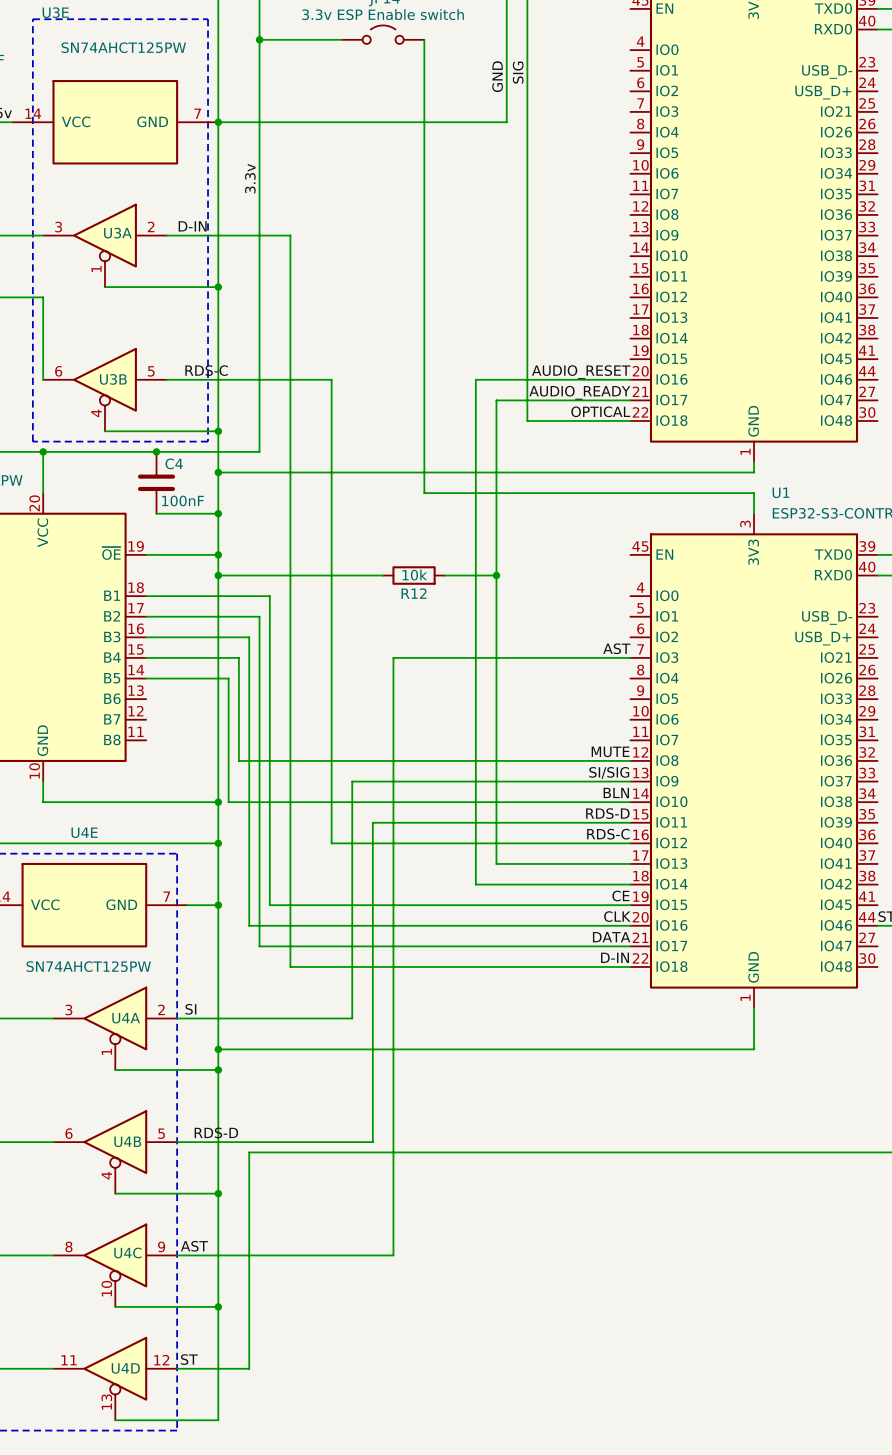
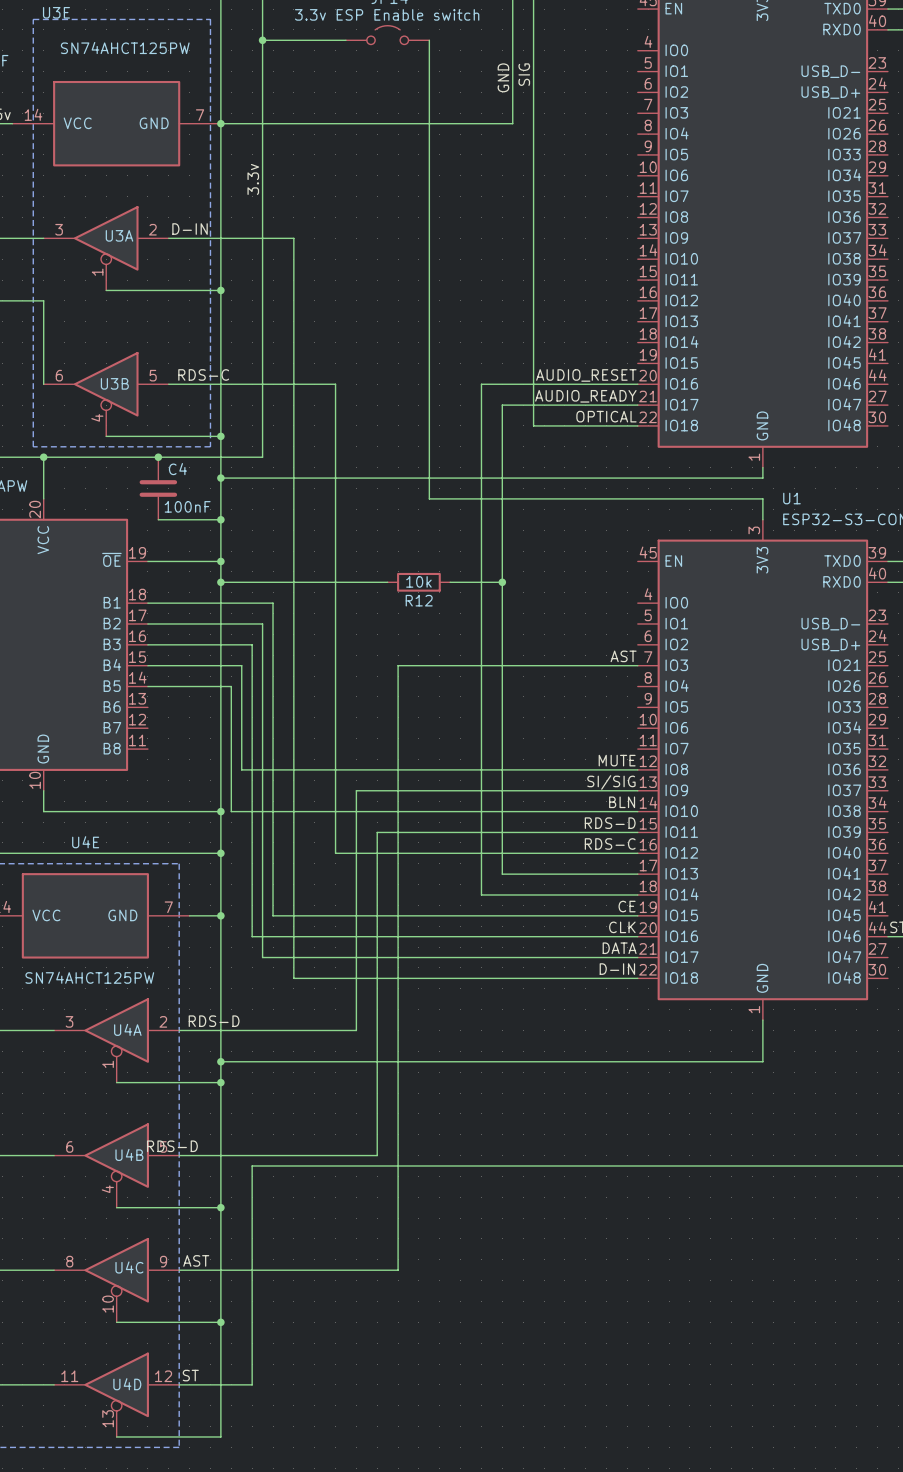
label: SI (190, 1009) -> none
label: none -> RDS-D (214, 1021)
label position: RDS-D (216, 1132) -> RDS-D (172, 1146)

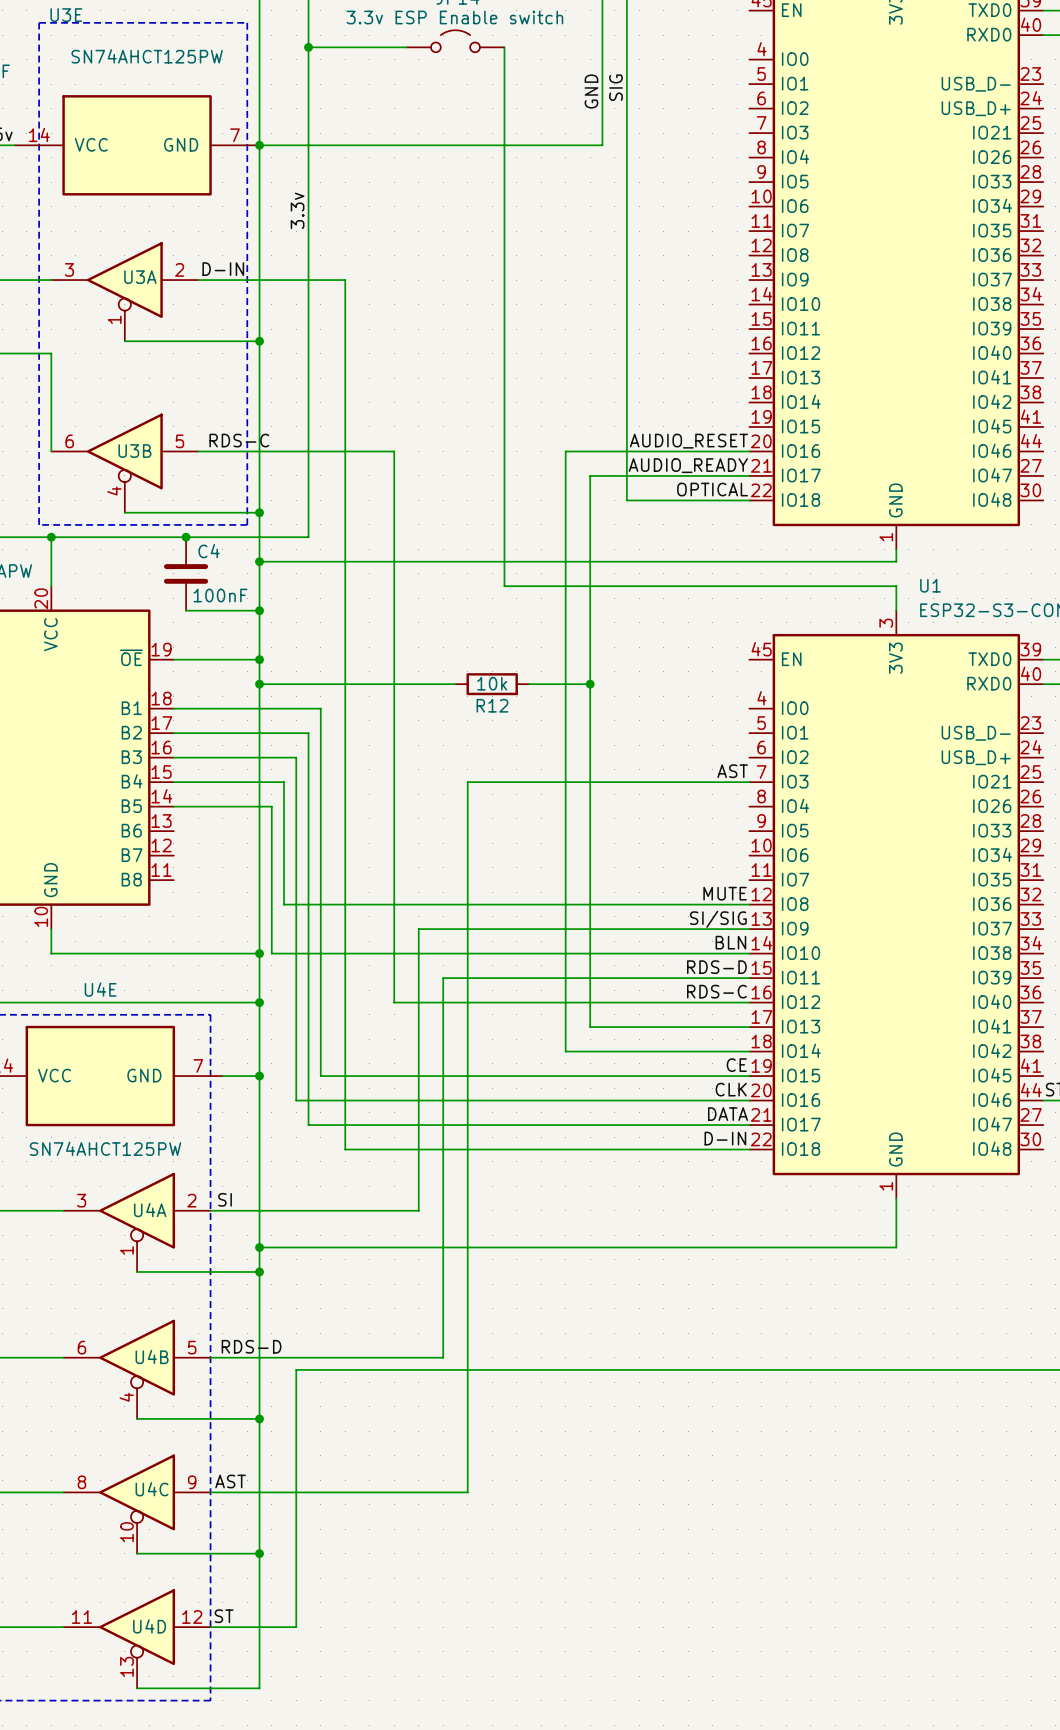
label: none -> SI (225, 1199)
label: RDS-D (214, 1021) -> none
label position: RDS-D (172, 1146) -> RDS-D (251, 1346)

